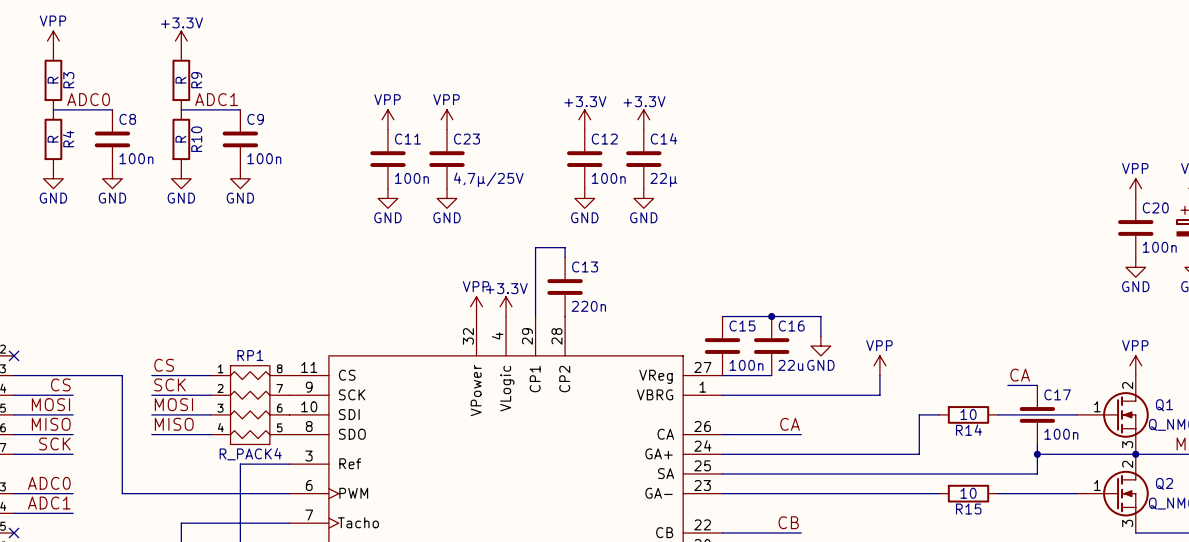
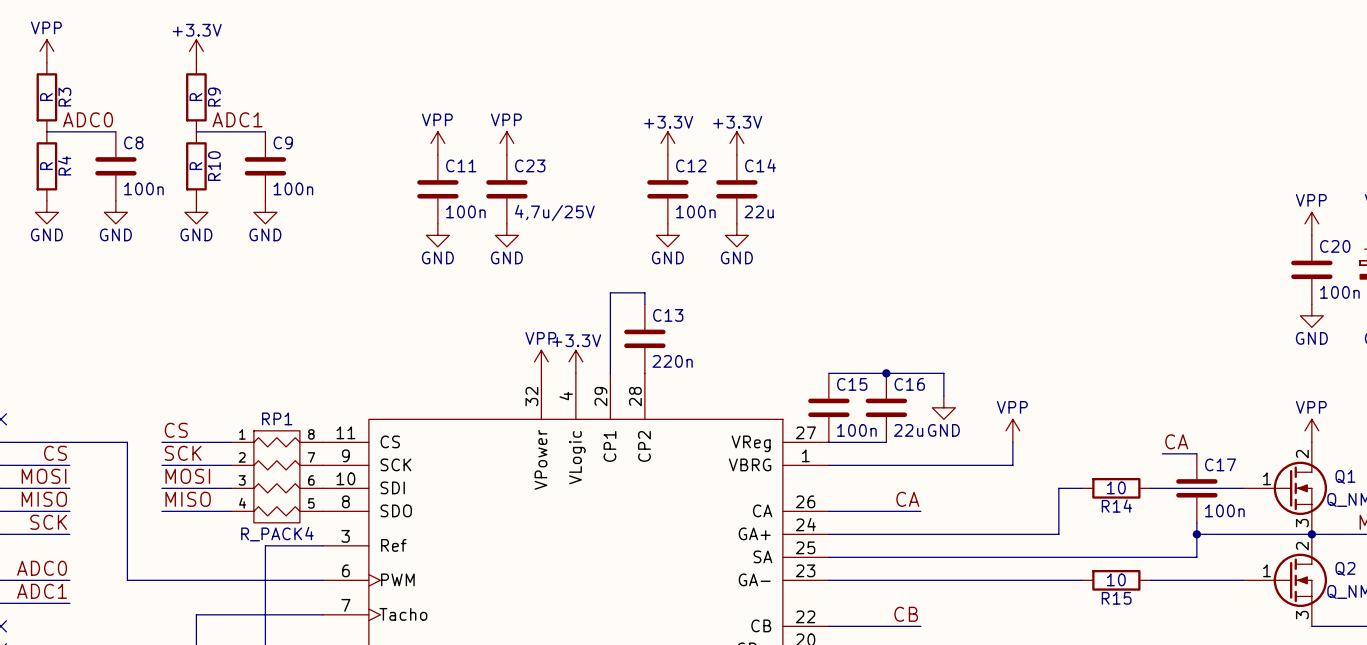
C23 value: 4,7µ/25V (488, 179) -> 4,7u/25V (554, 213)
C14 value: 22µ (663, 180) -> 22u (759, 211)

